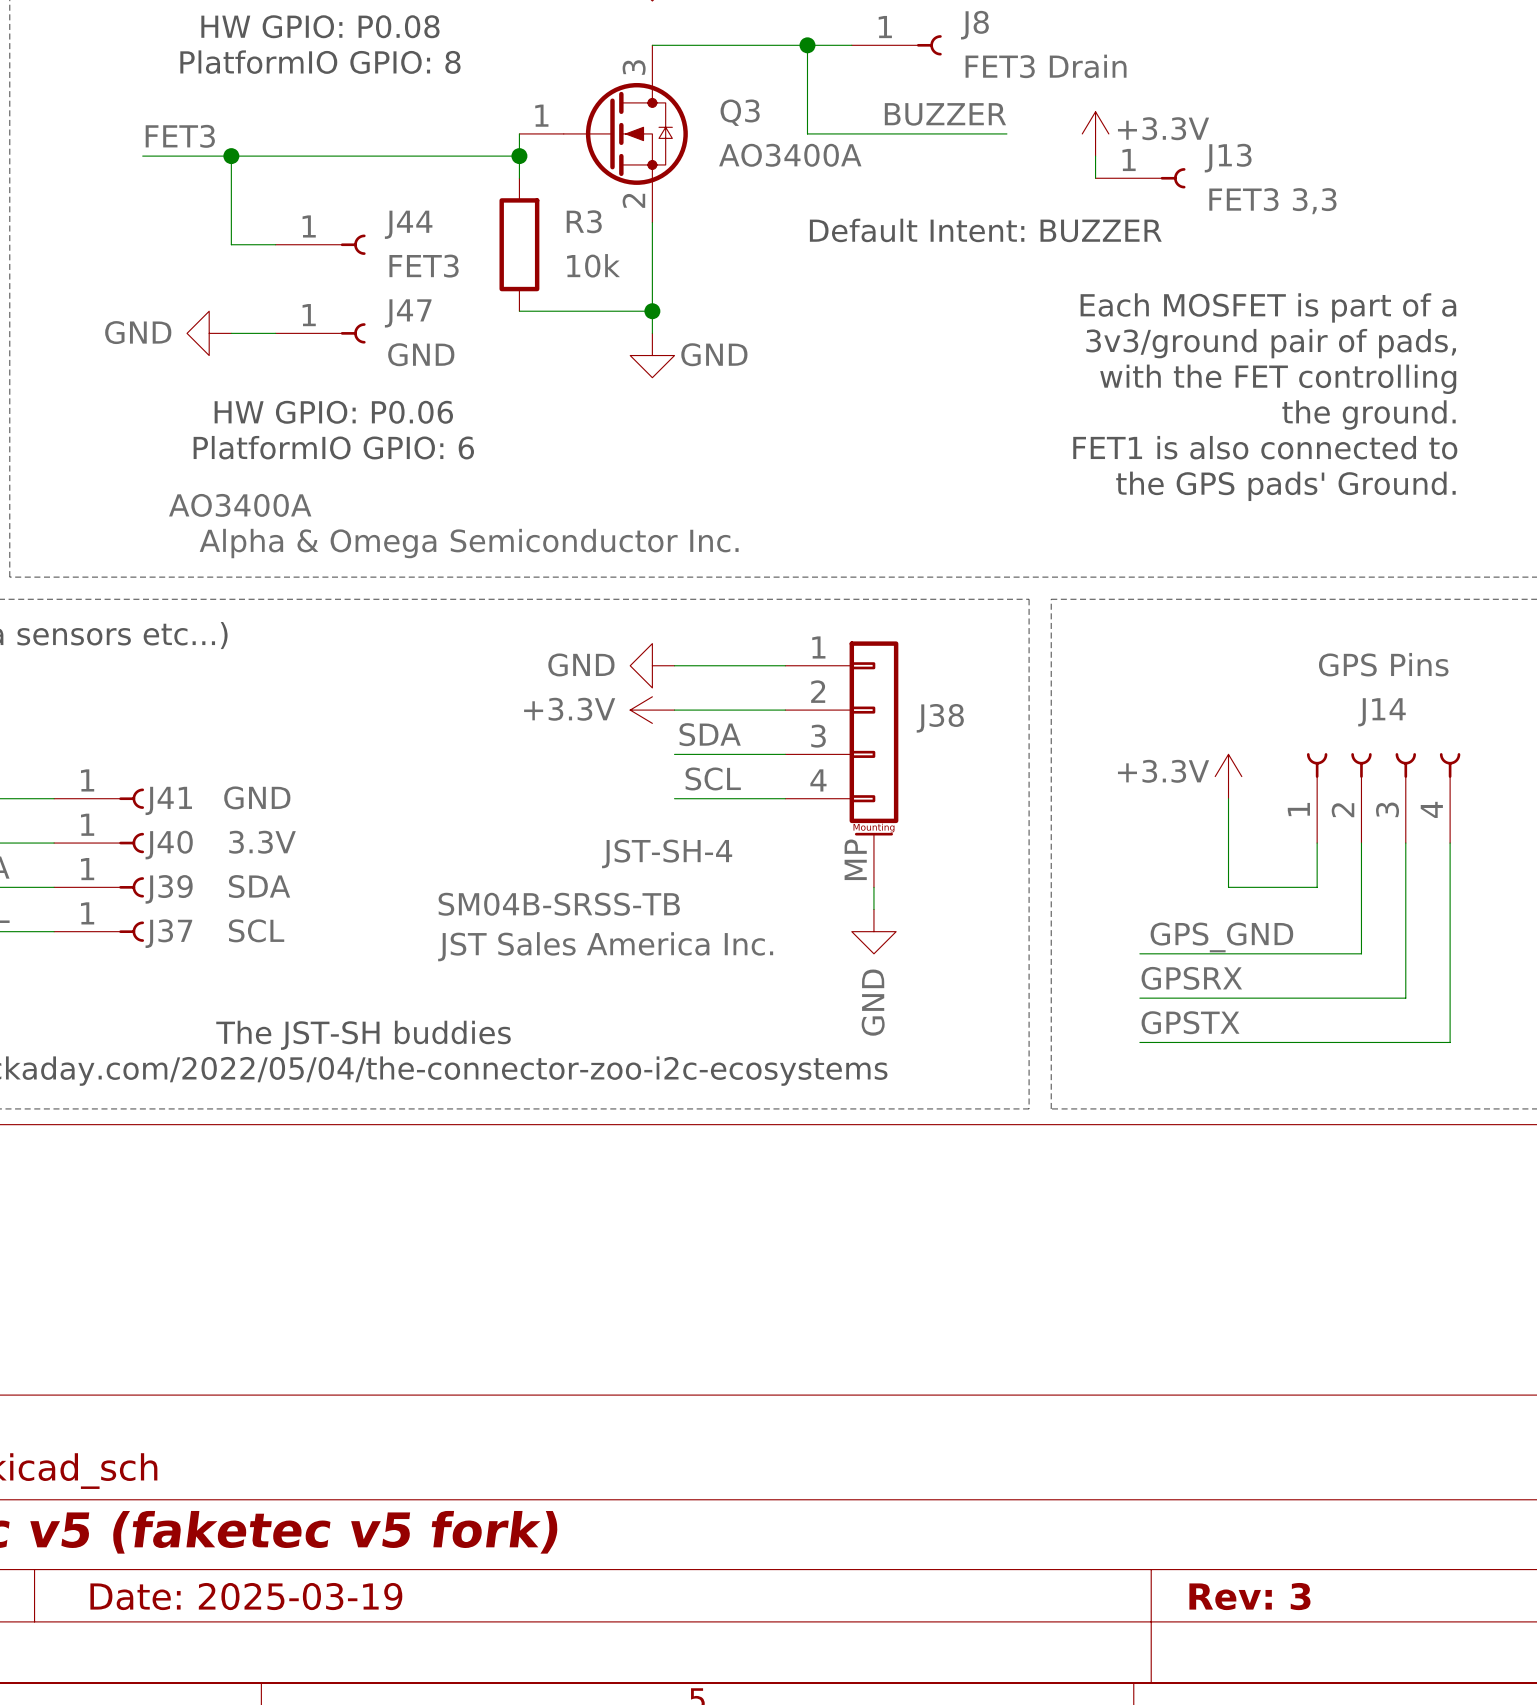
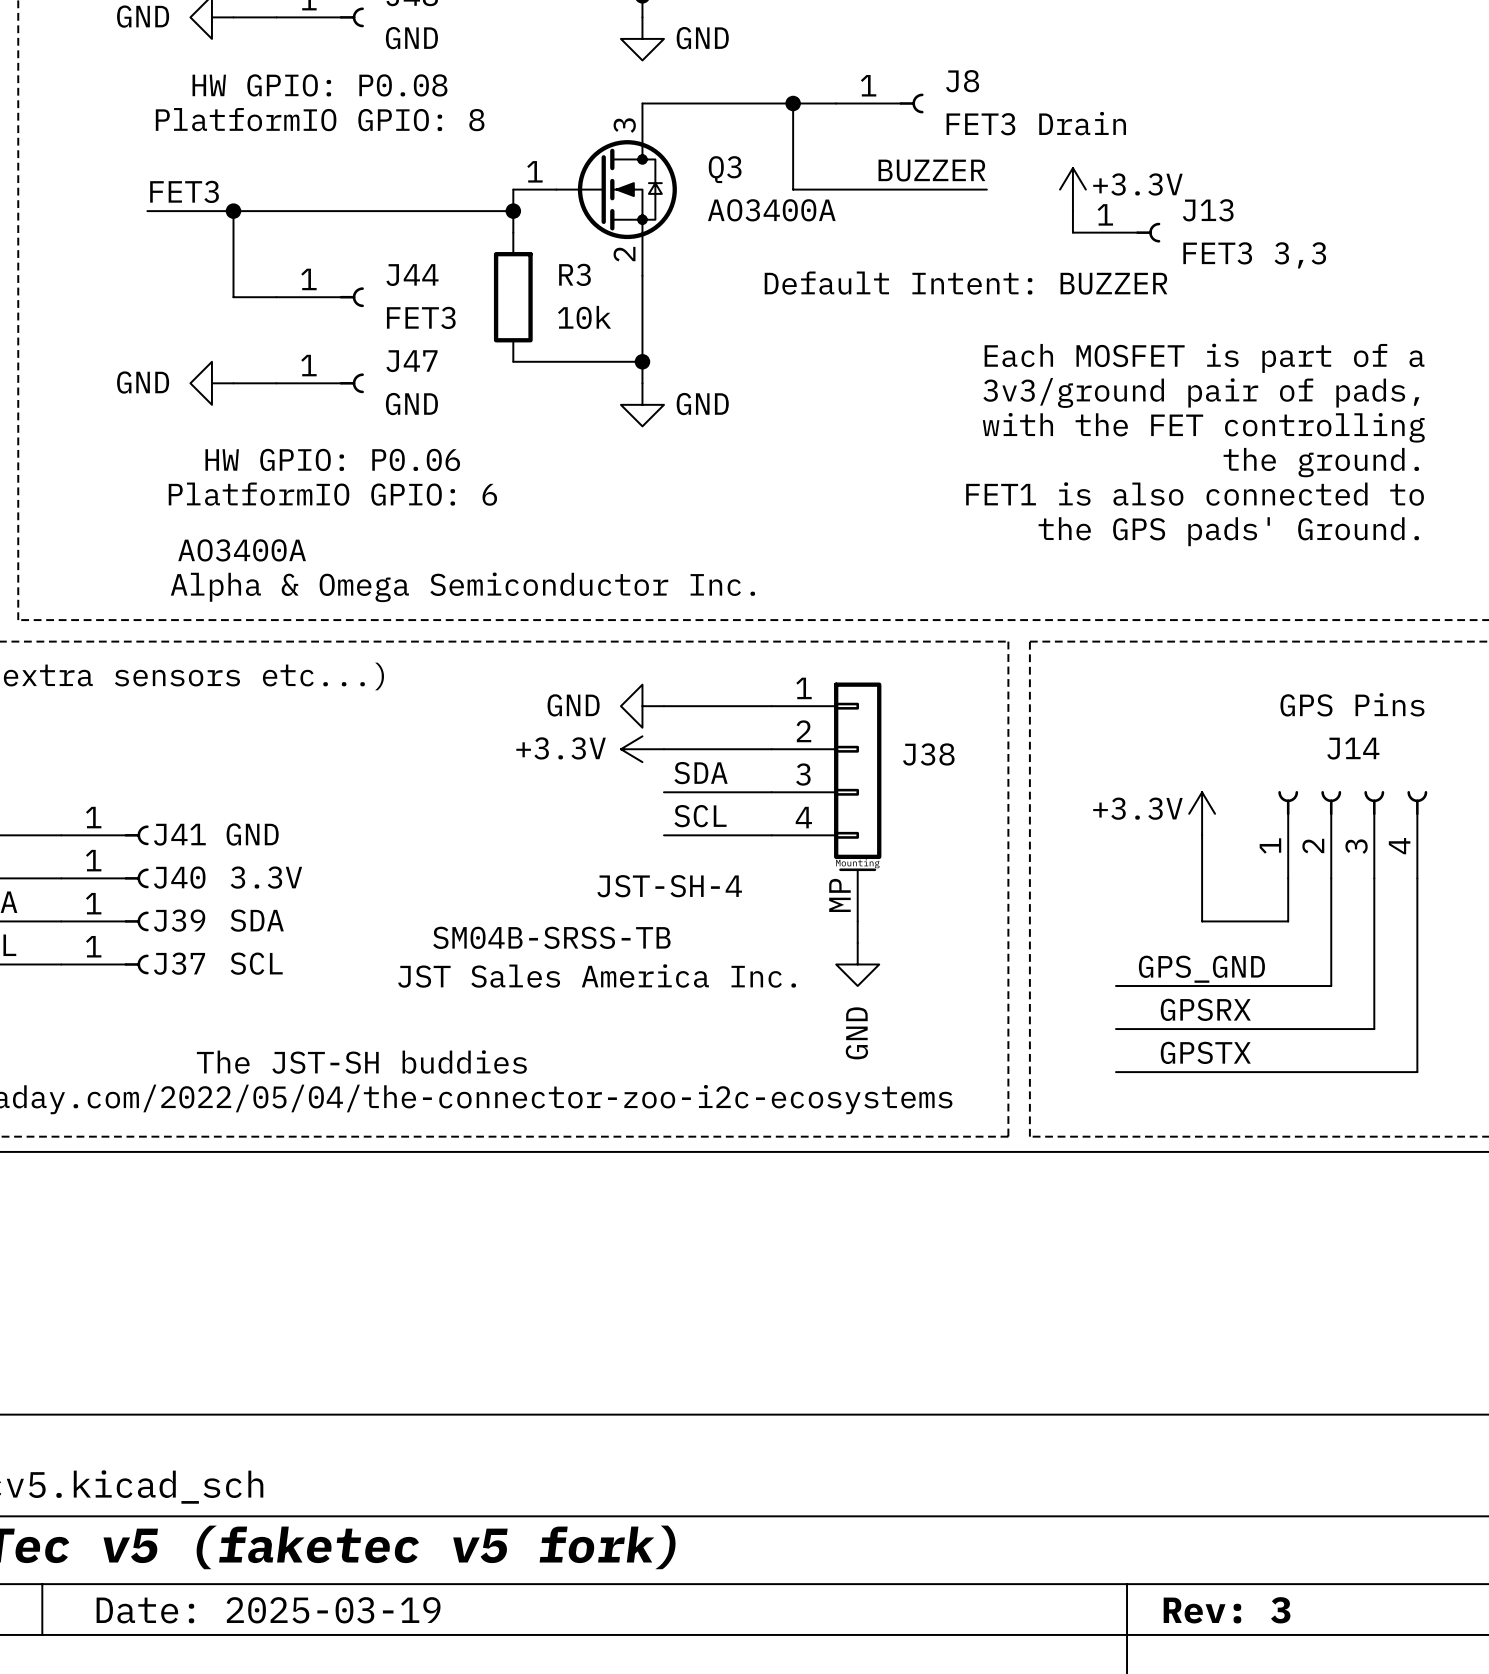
label position: GPSRX (1191, 978) -> GPSRX (1205, 1009)
label position: GPSTX (1190, 1022) -> GPSTX (1205, 1052)

